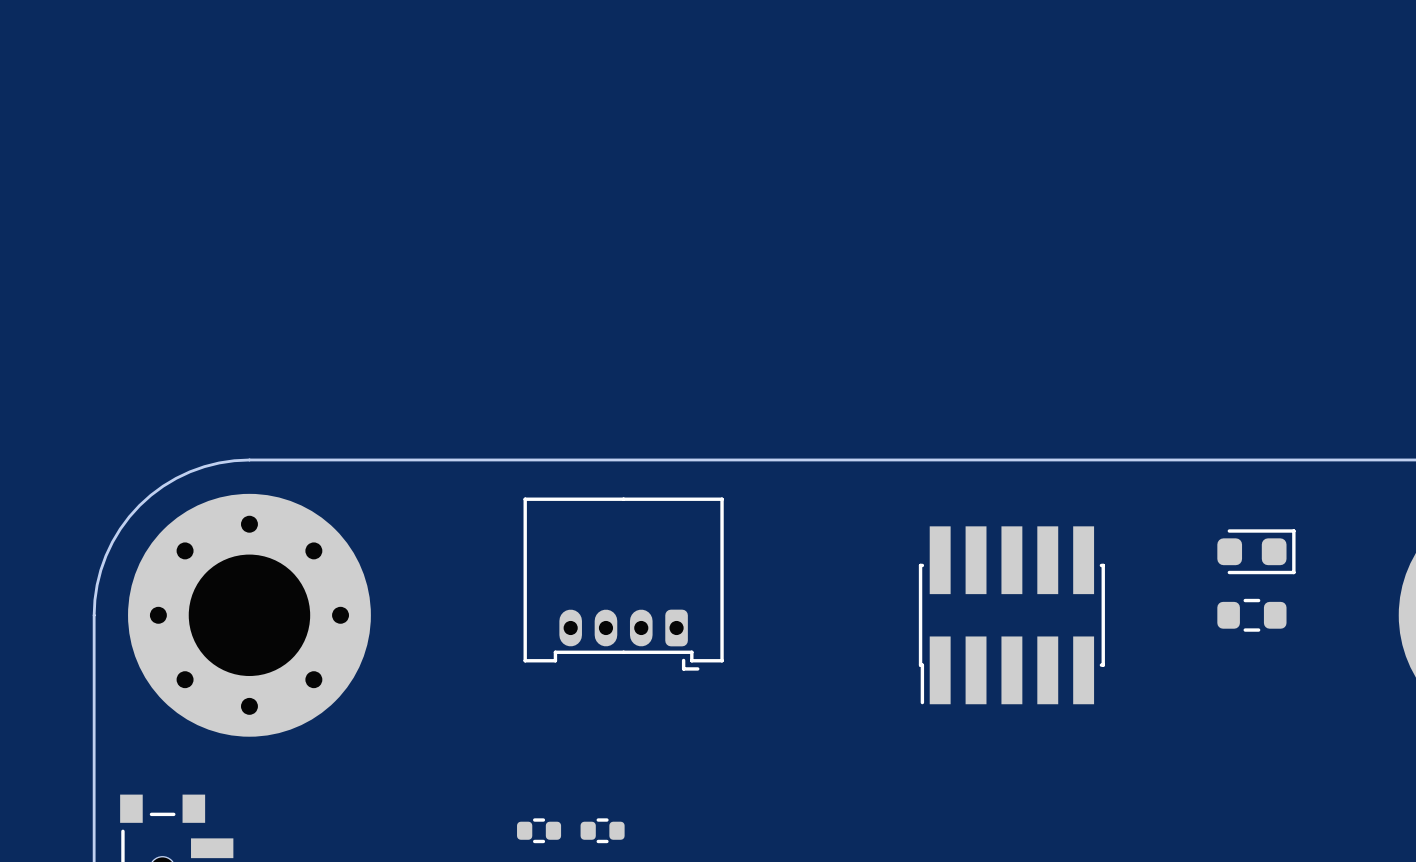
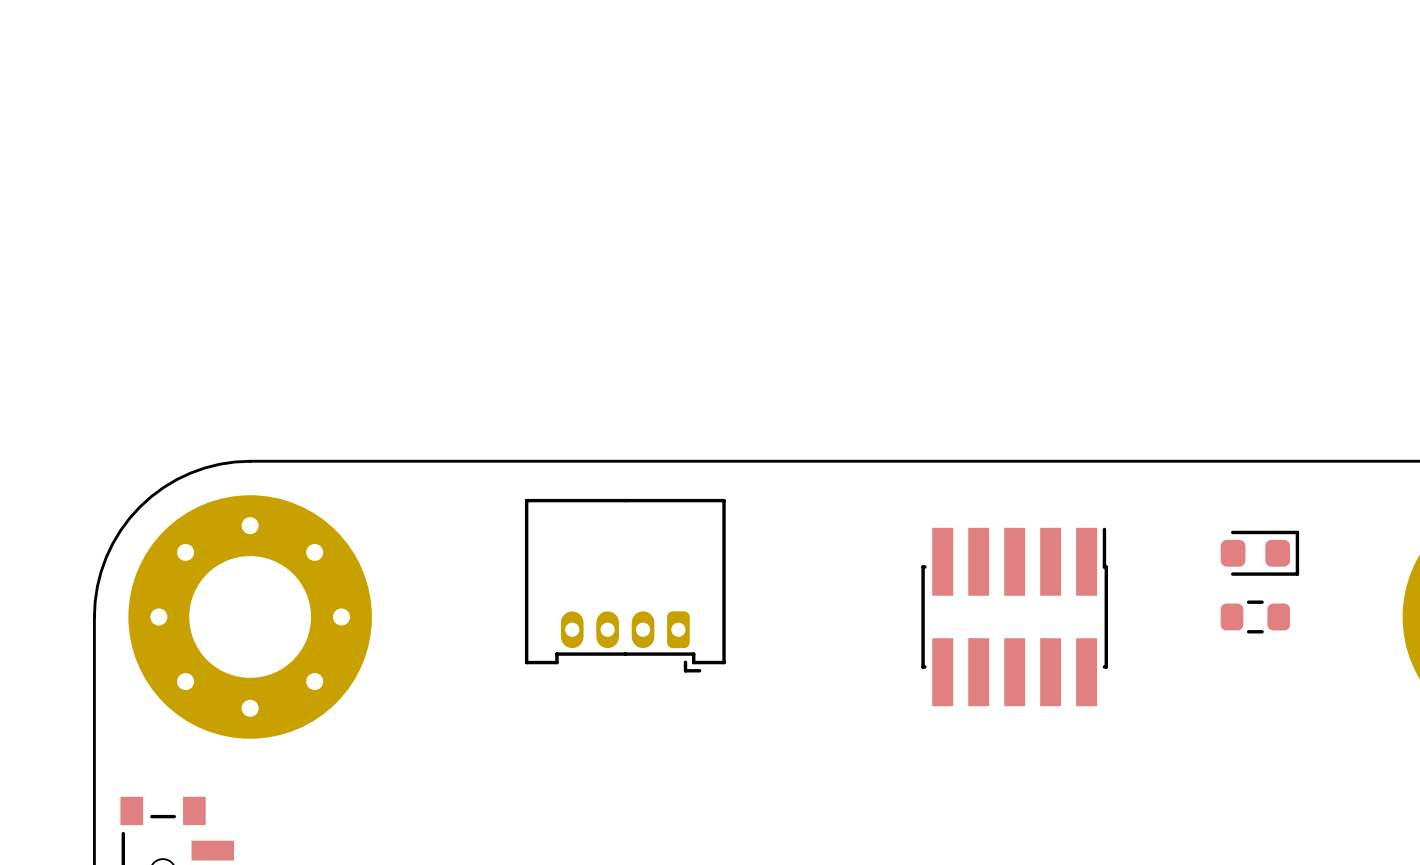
part rotation: 0° (1011, 615) -> 180° (1014, 616)
part: (539, 830) -> none
part: (602, 830) -> none

